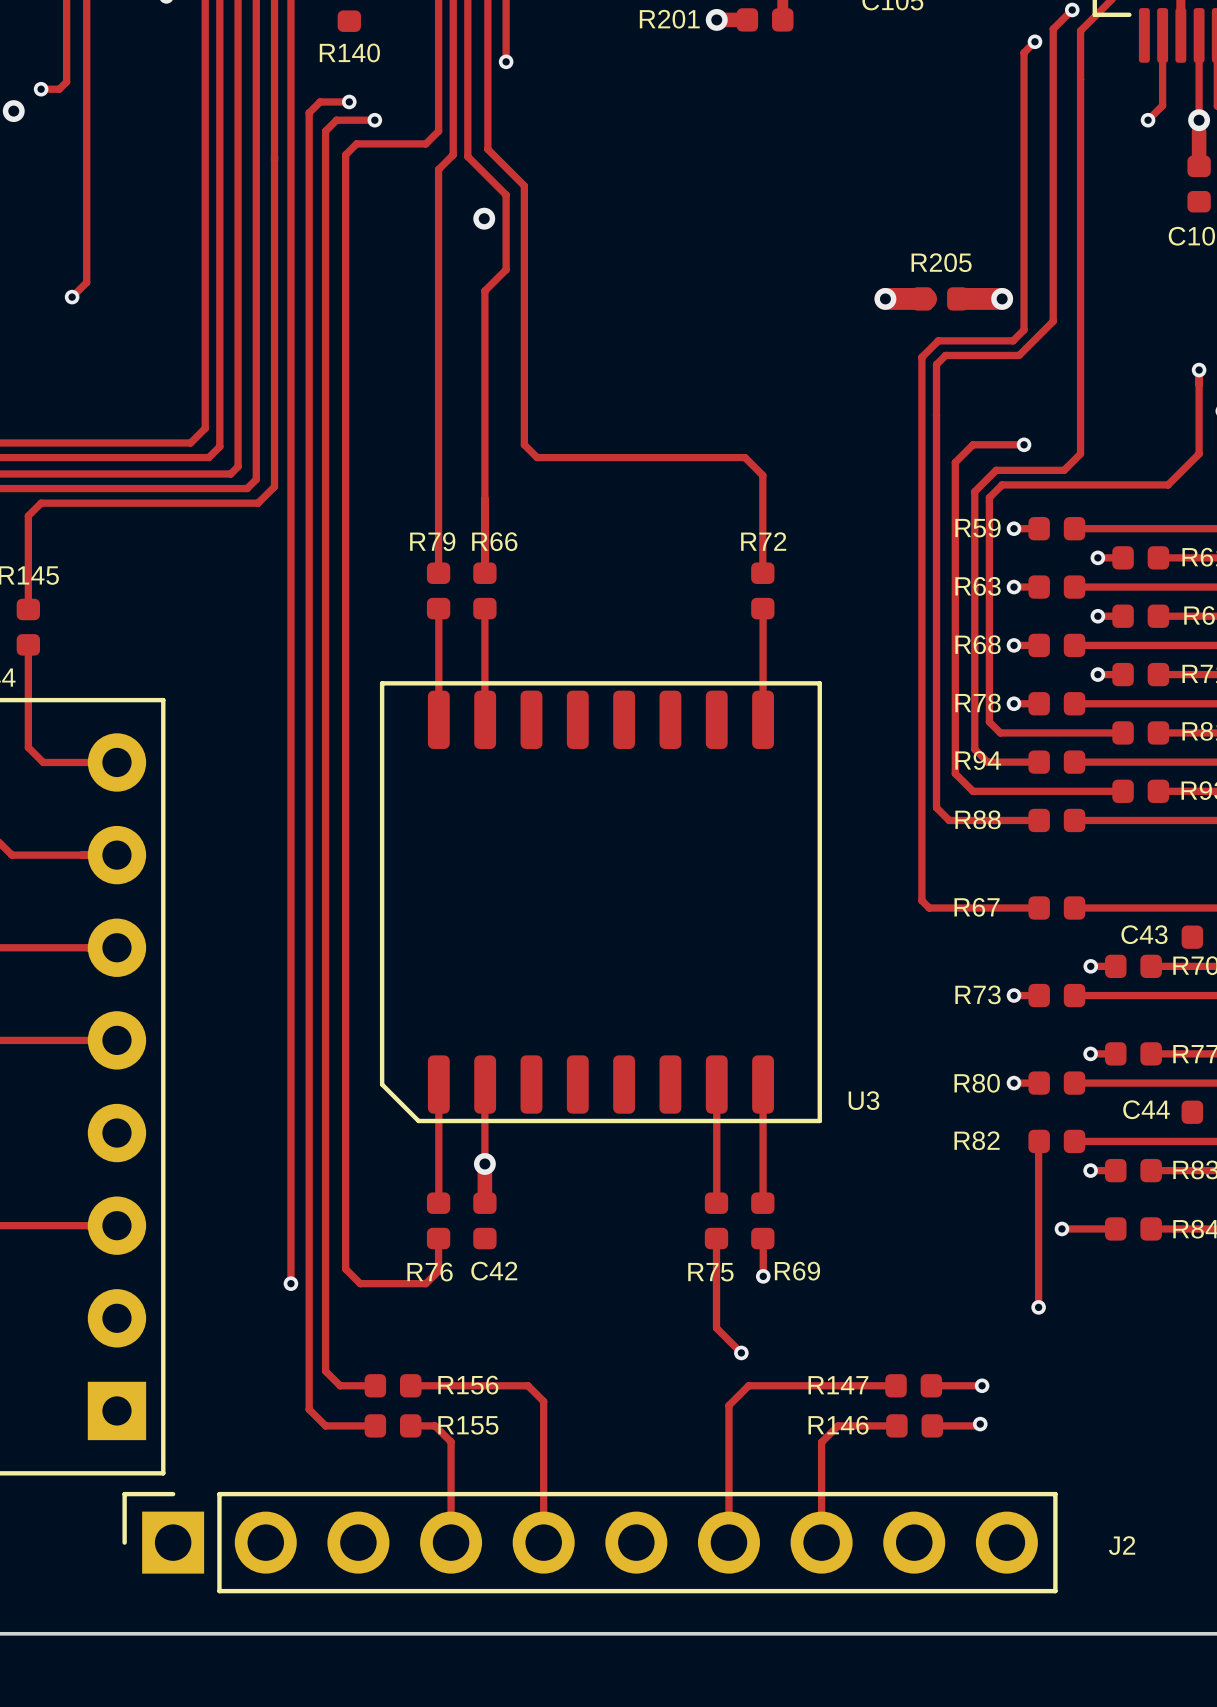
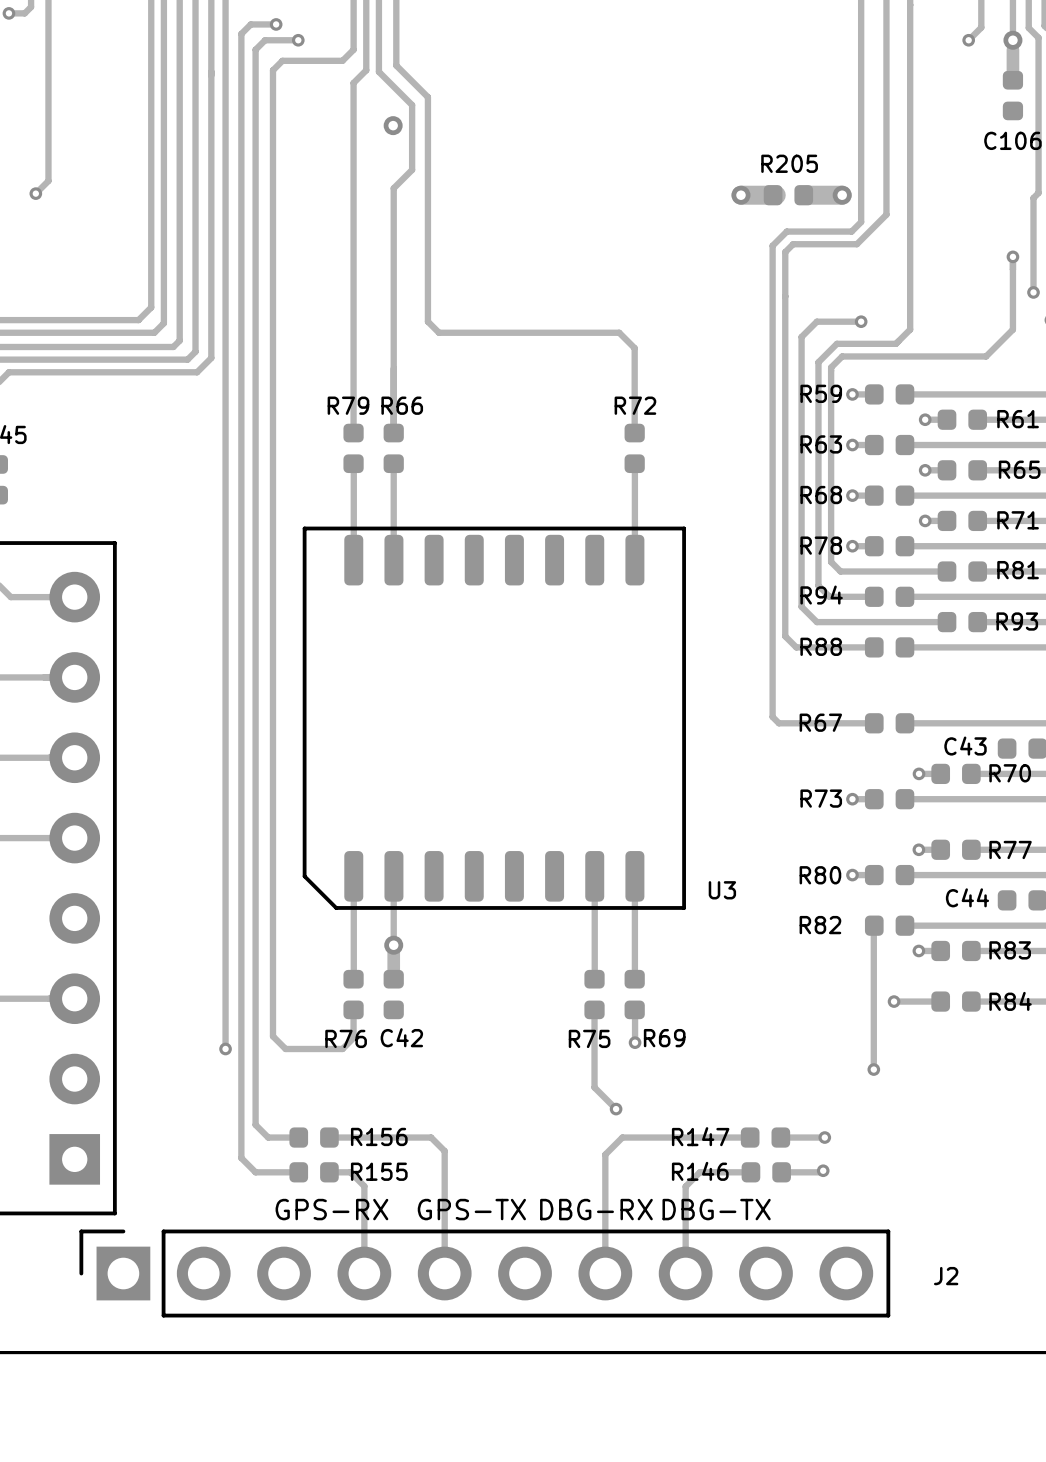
text: none -> GPS-RX (331, 1209)
text: none -> GPS-TX (471, 1209)
text: none -> DBG-RX (596, 1209)
text: none -> DBG-TX (716, 1209)

